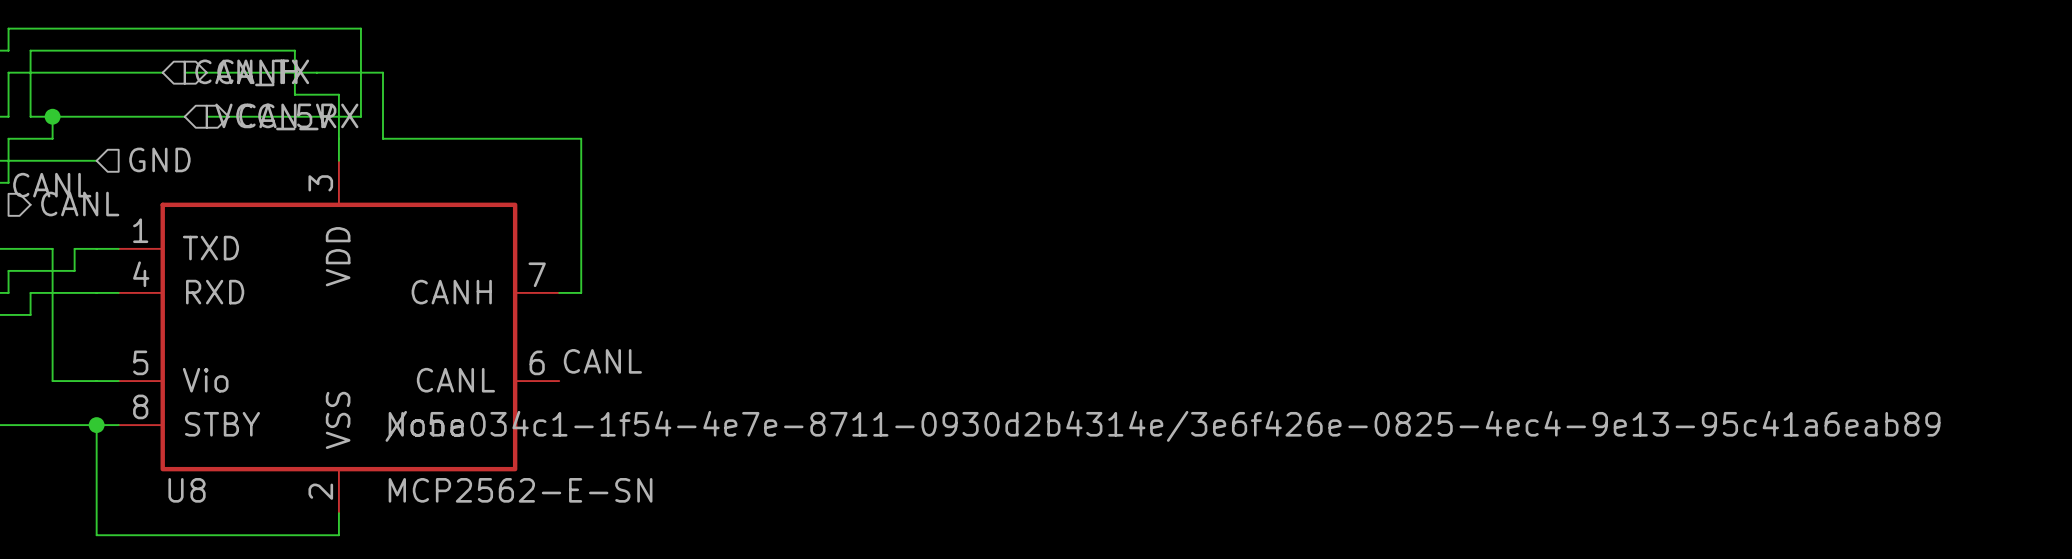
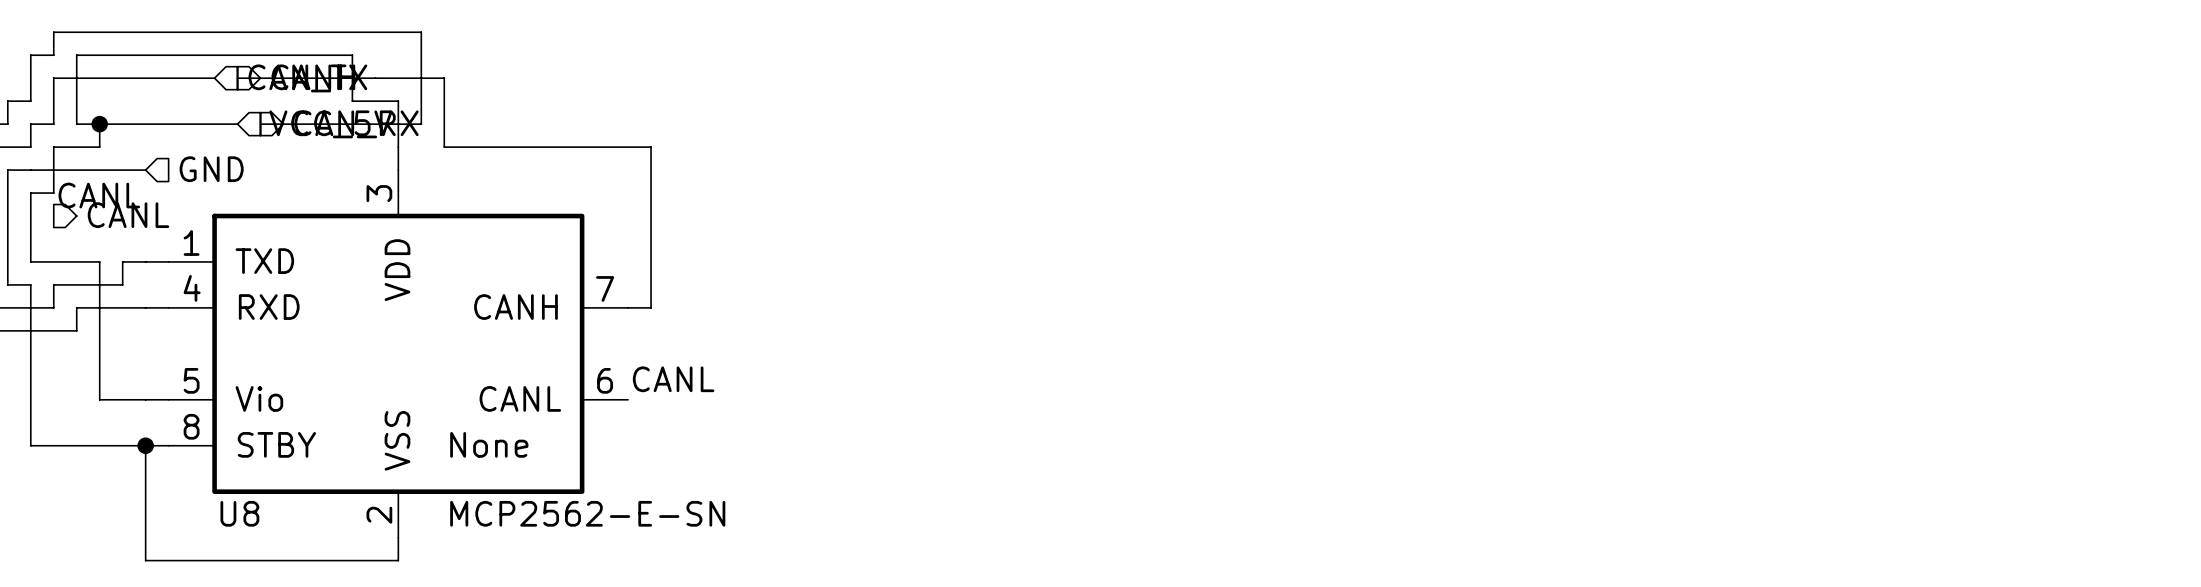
U8 text: /c5a034c1-1f54-4e7e-8711-0930d2b4314e/3e6f426e-0825-4ec4-9e13-95c41a6eab89 (1162, 426) -> none

